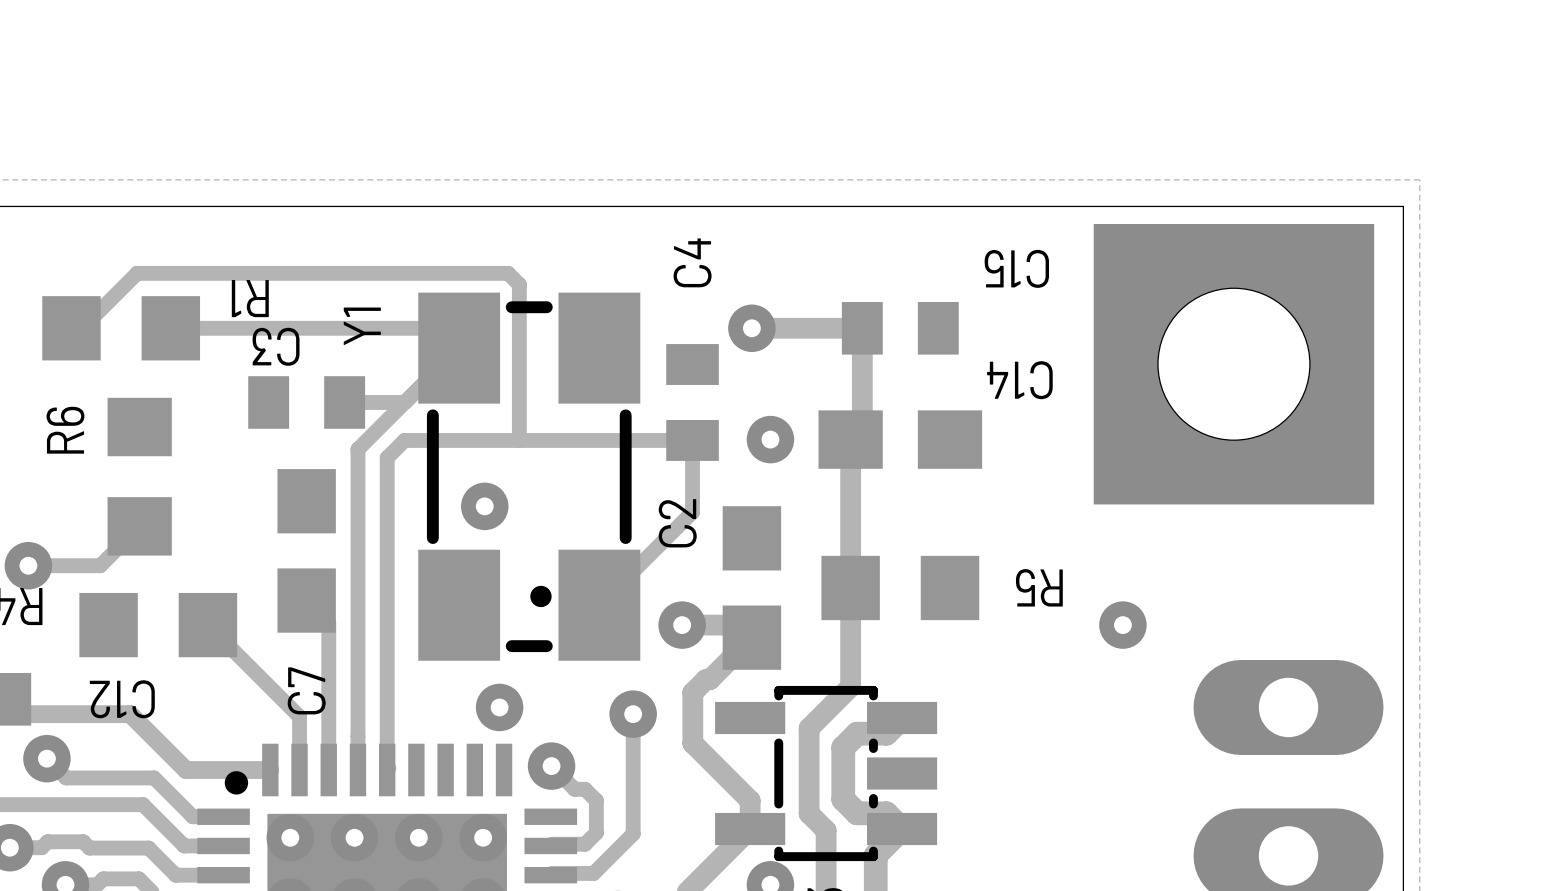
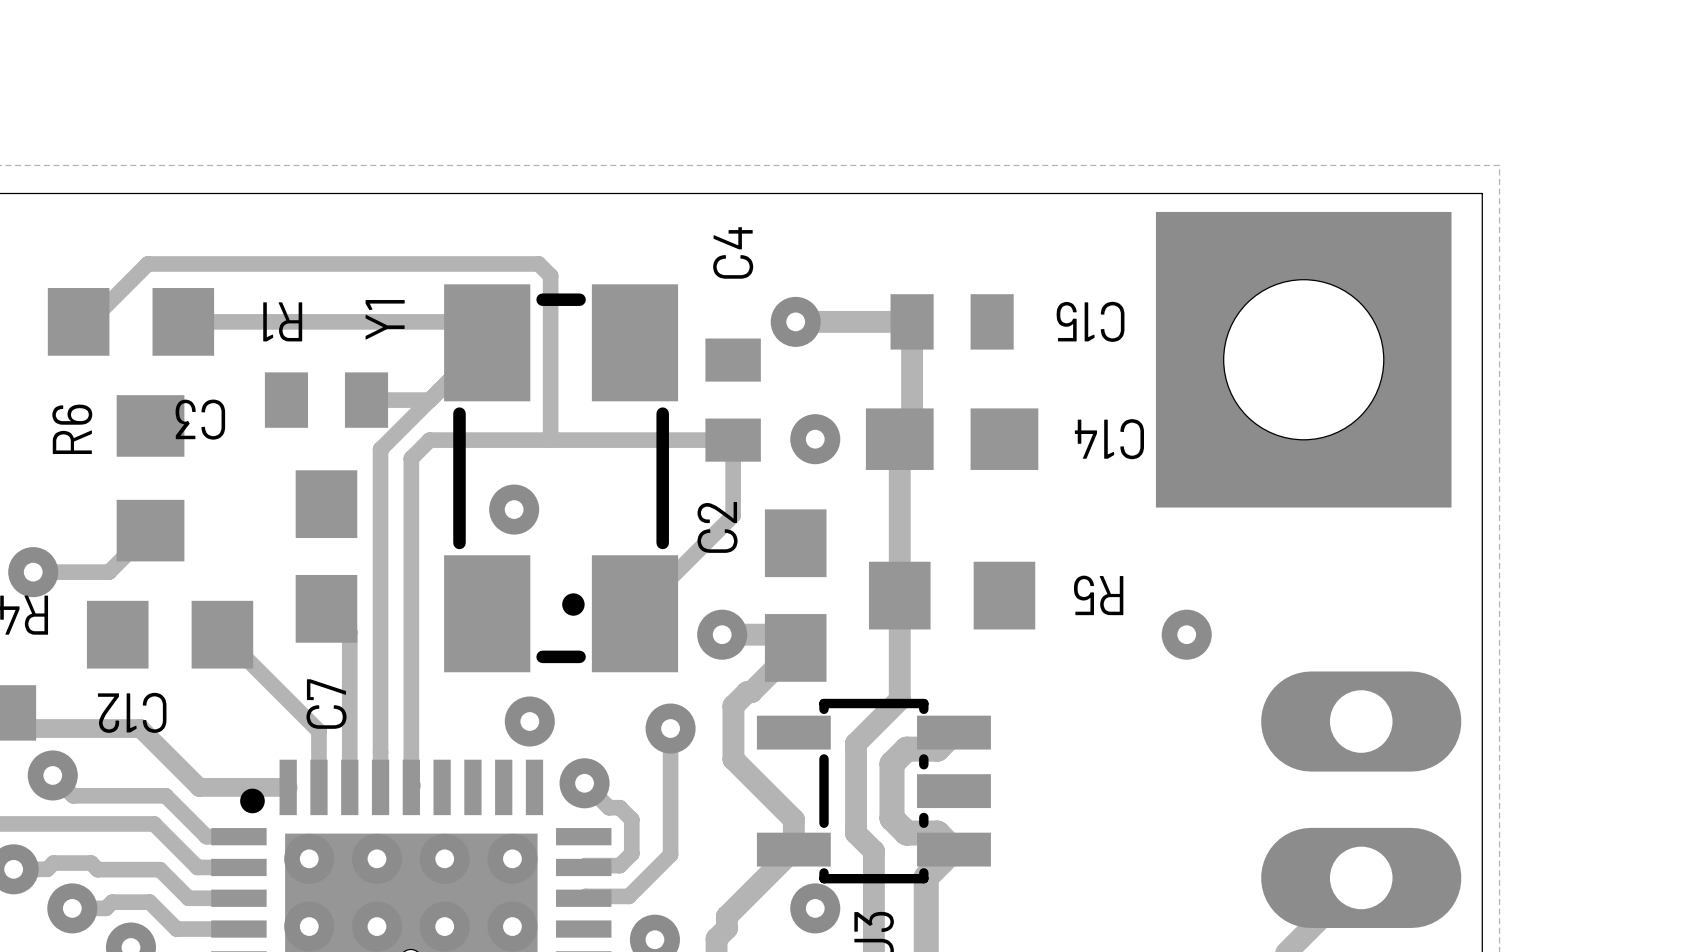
C15 name position: C15 (1016, 268) -> C15 (1090, 321)
R1 name position: R1 (250, 298) -> R1 (282, 321)
C3 name position: C3 (276, 346) -> C3 (200, 419)
C14 name position: C14 (1019, 380) -> C14 (1109, 439)

